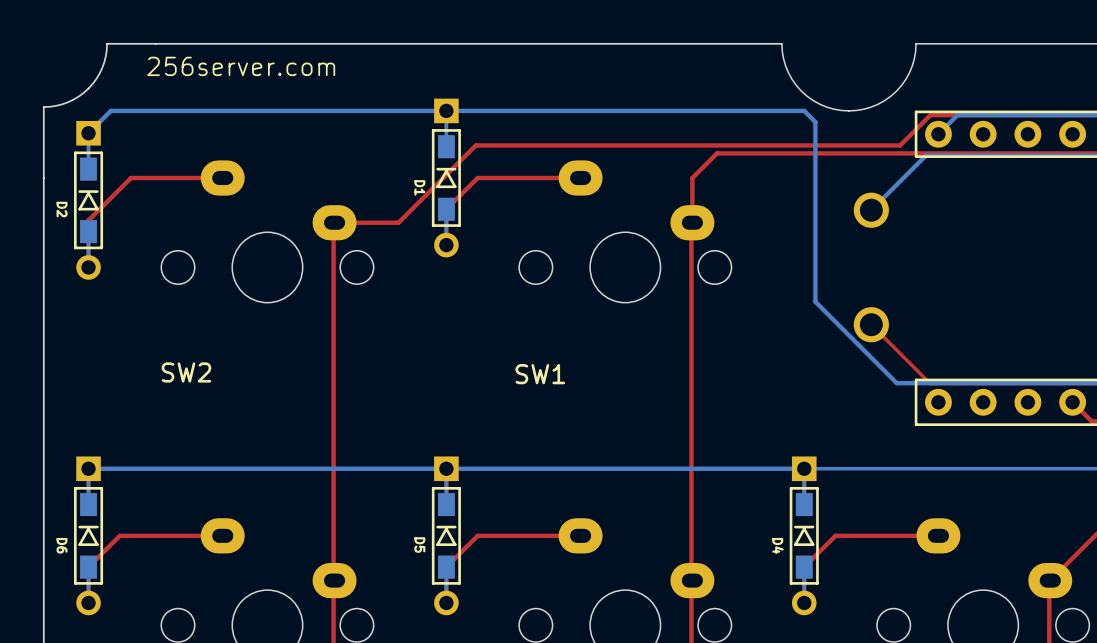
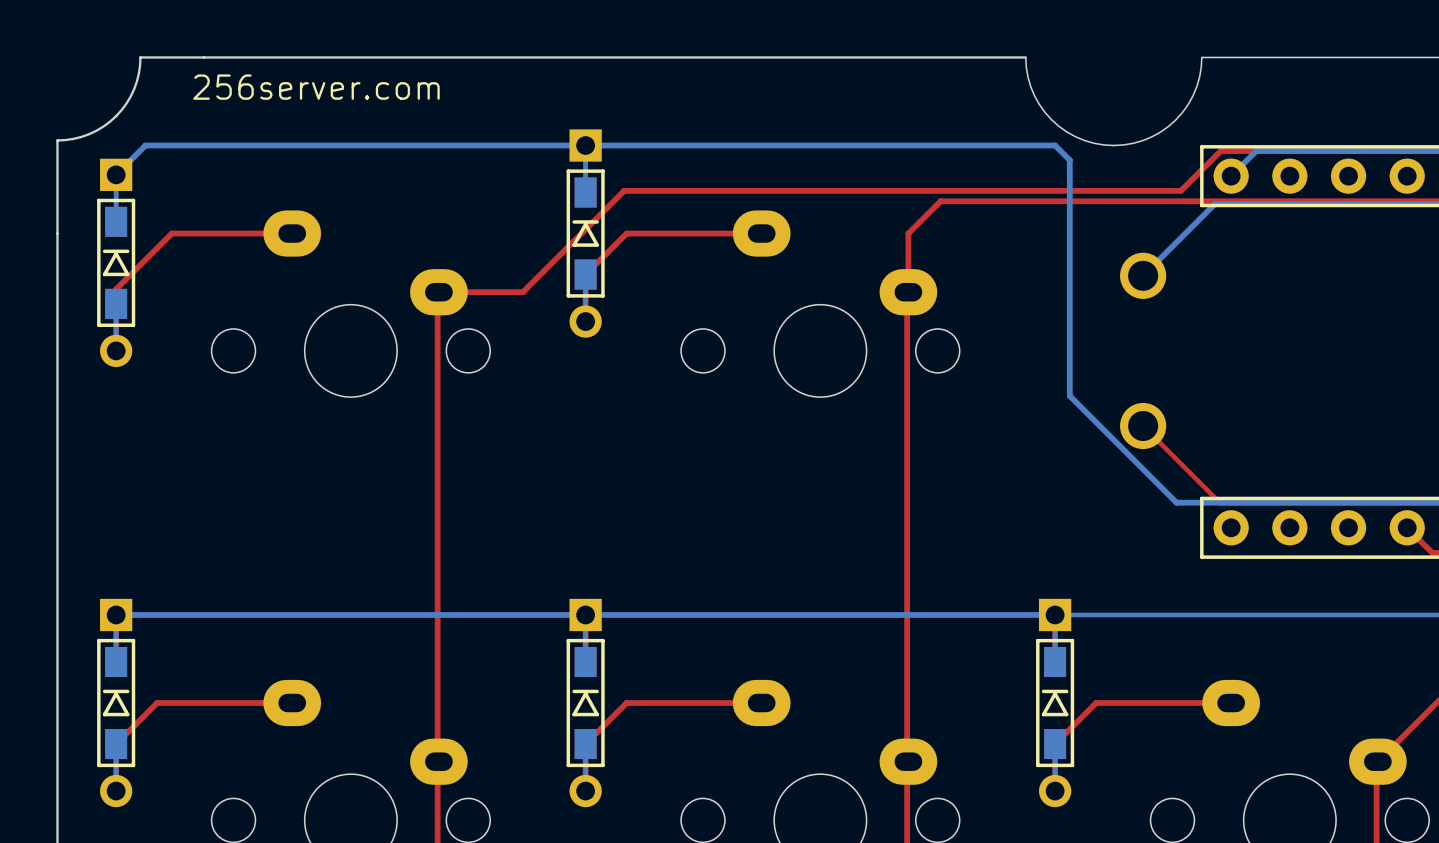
D1 name: D1 (419, 187) -> none
D2 name: D2 (62, 209) -> none
SW2 name: SW2 (186, 372) -> none
SW1 name: SW1 (540, 374) -> none
D6 name: D6 (62, 545) -> none
D5 name: D5 (419, 545) -> none
D4 name: D4 (777, 545) -> none

